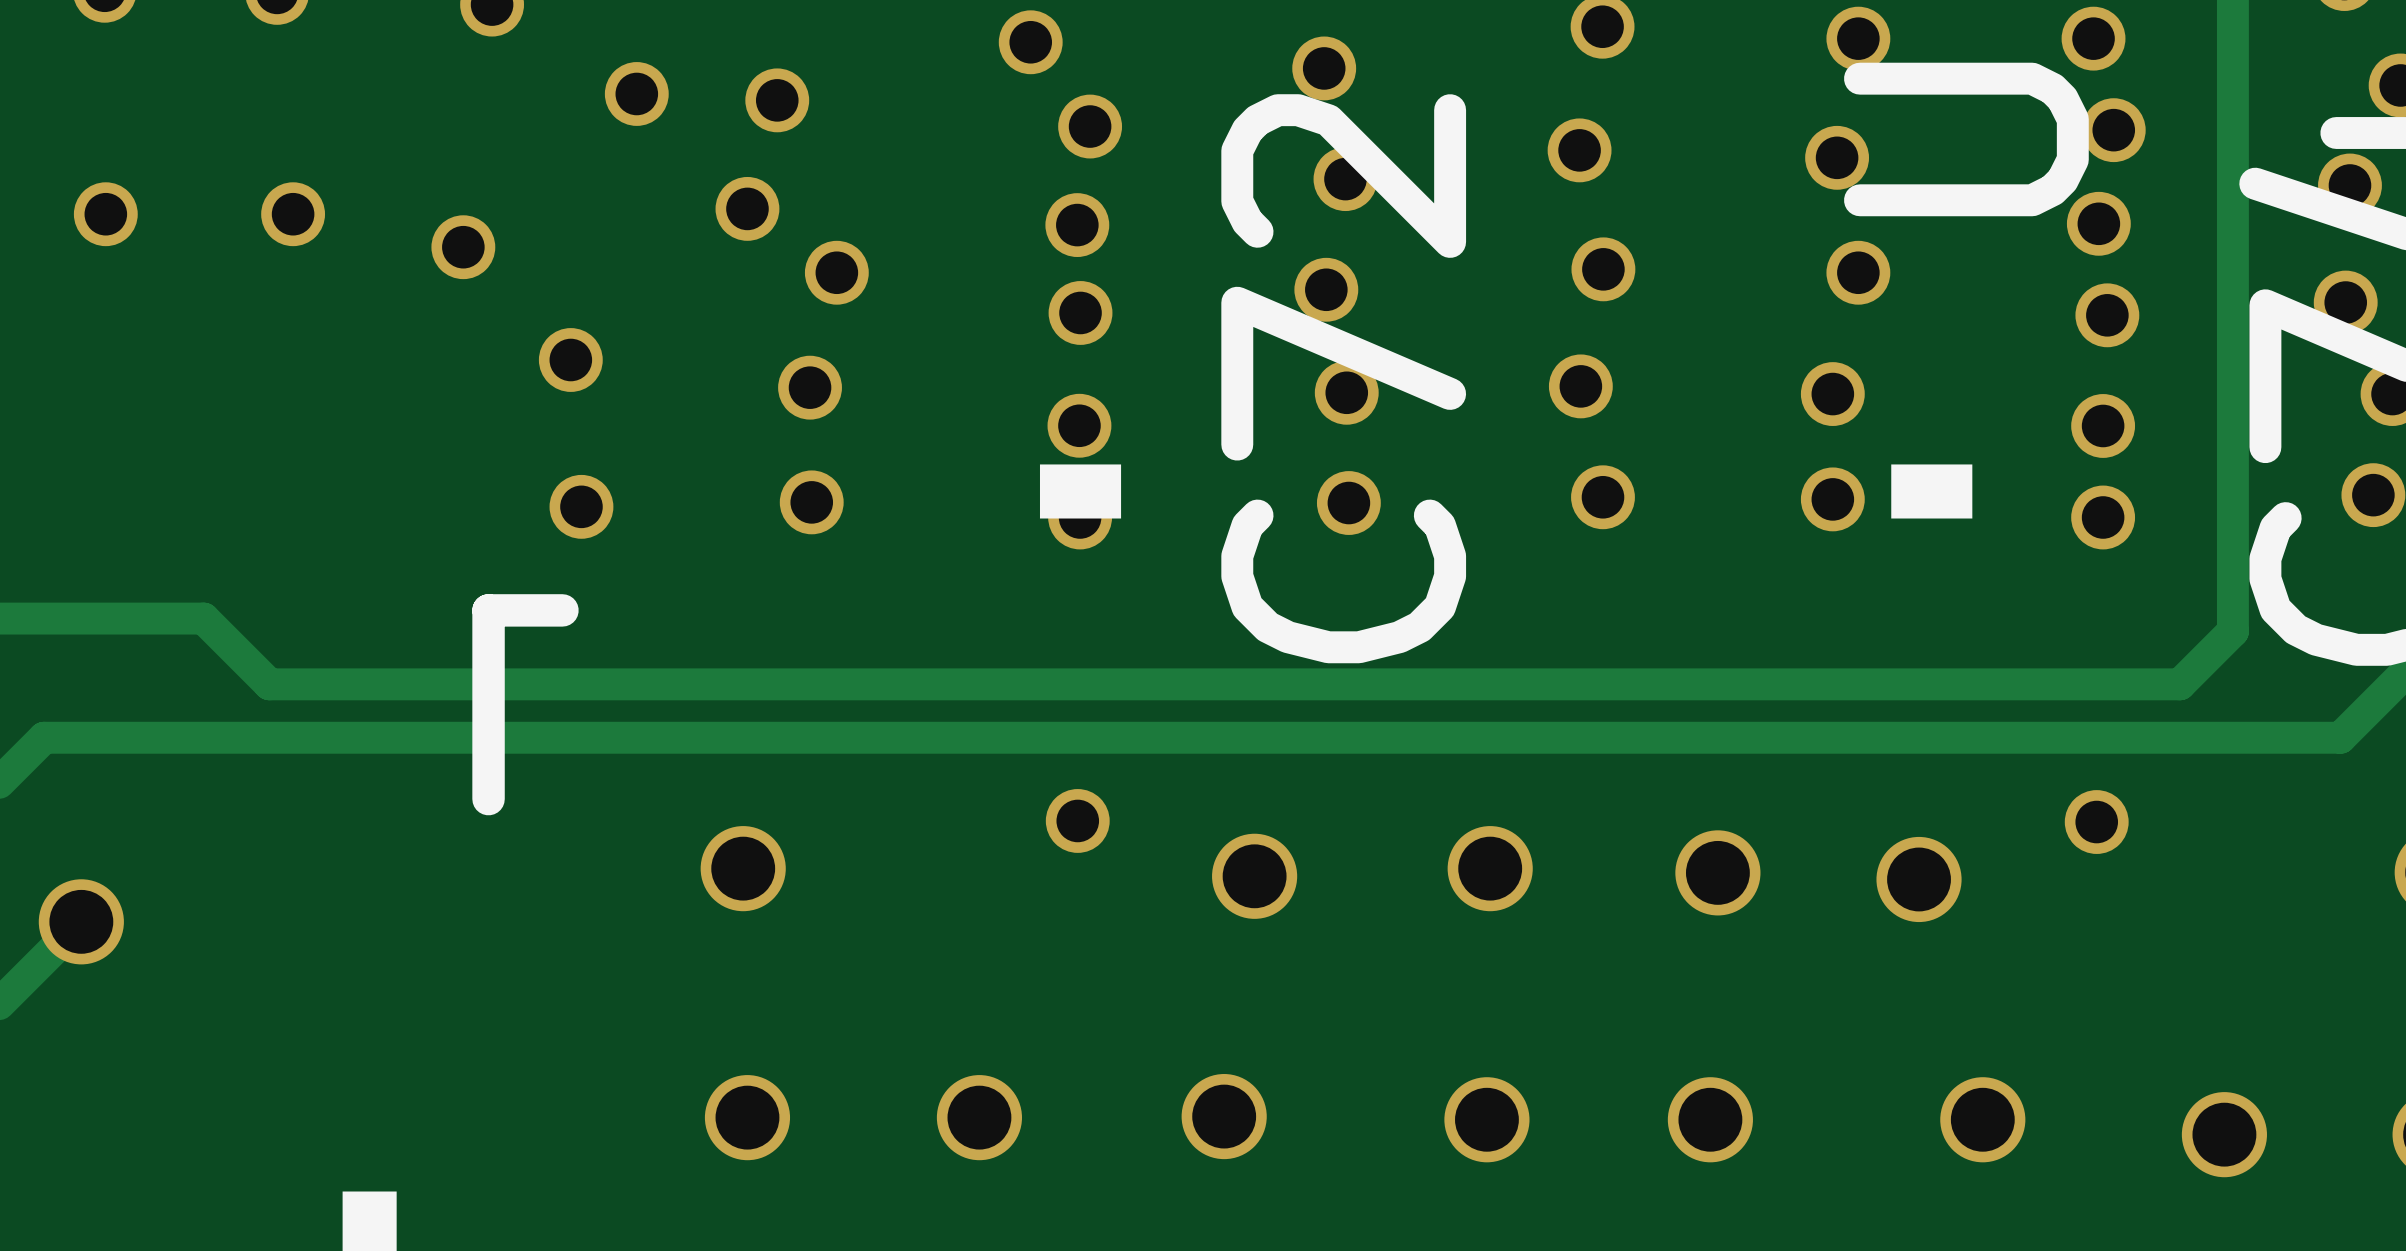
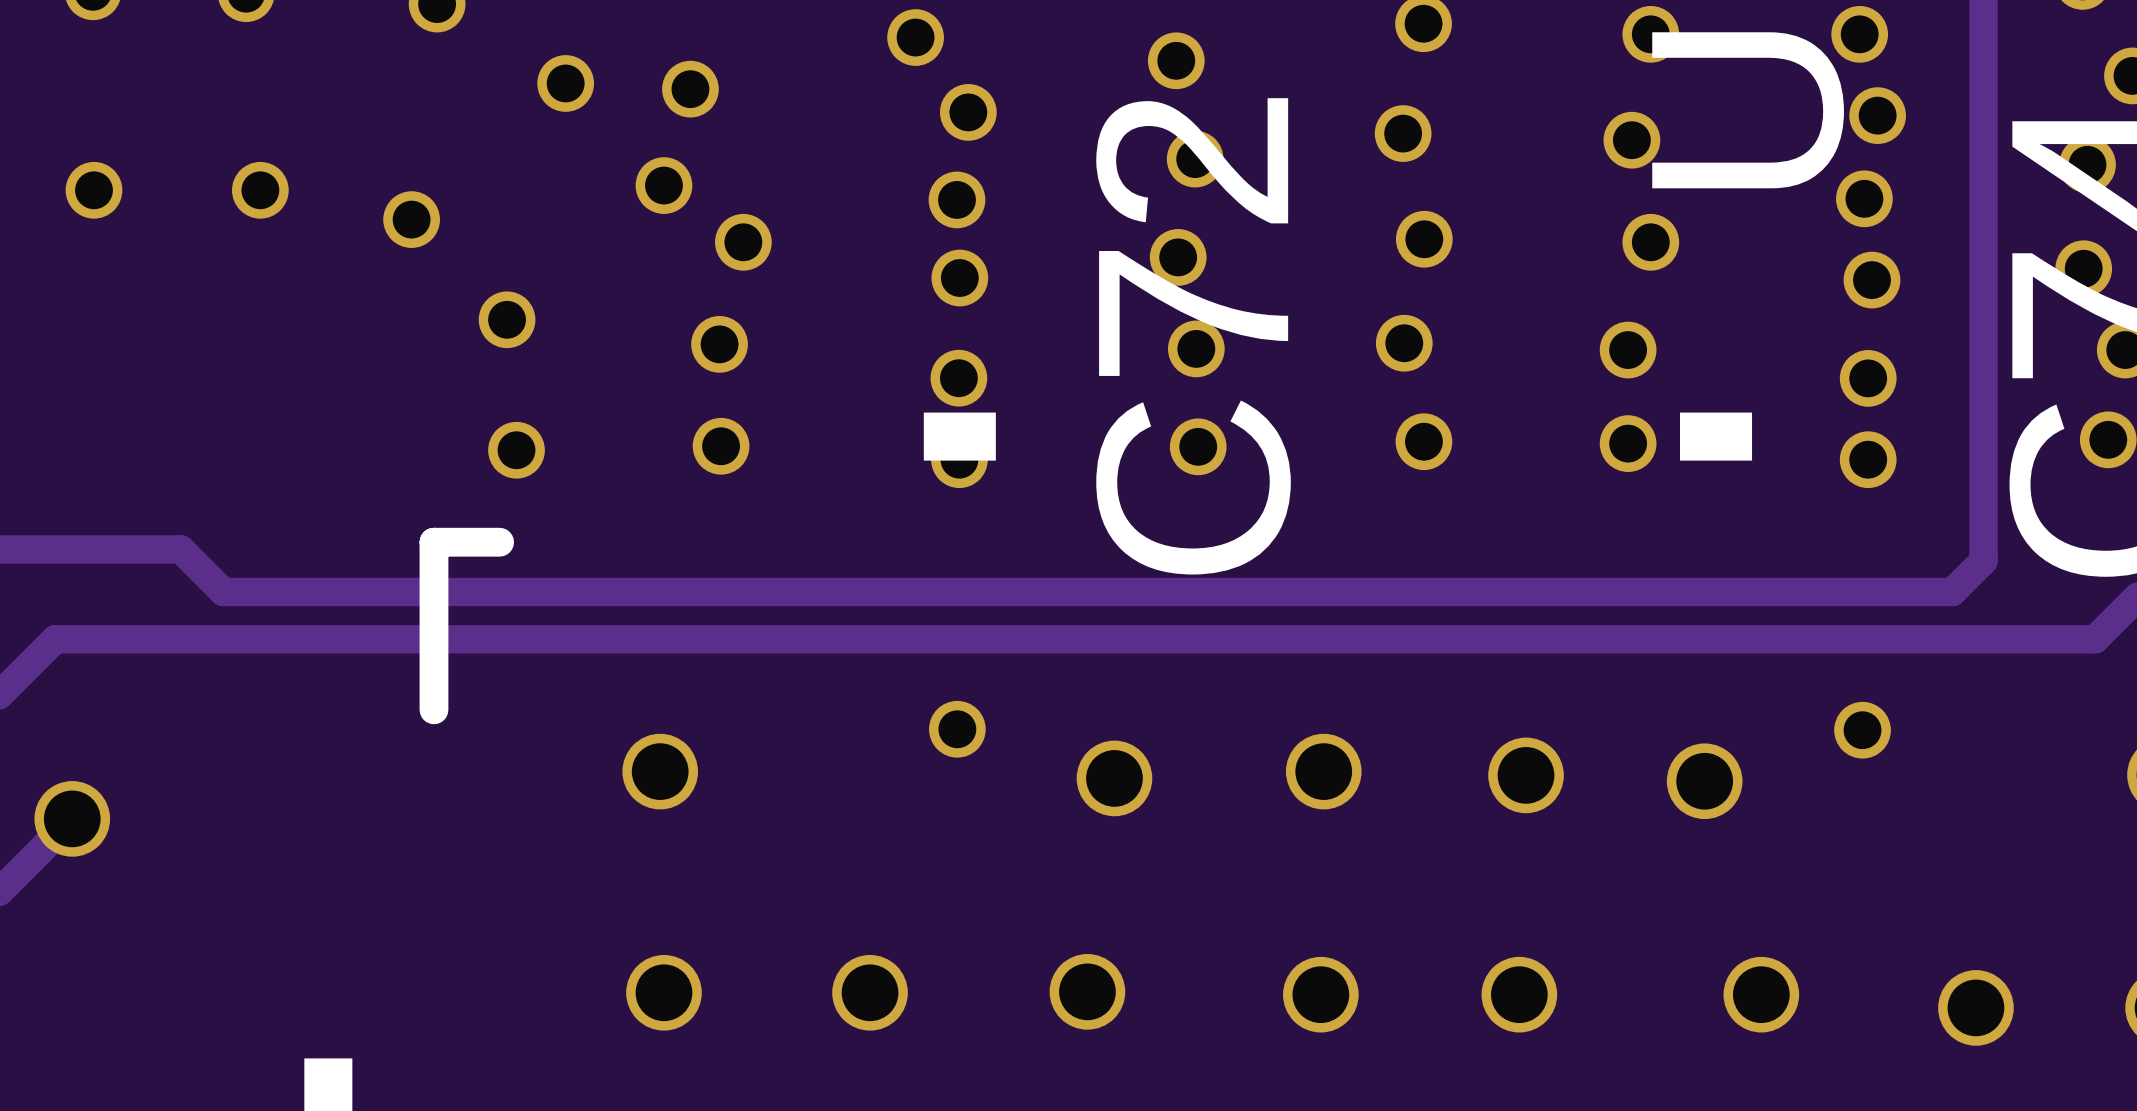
track: (251, 666) (269, 684) (2179, 684) (2197, 666) -> (223, 592) (1952, 592)
track: (2358, 719) (2340, 737) (44, 737) -> (2095, 639) (55, 639) (39, 655)

